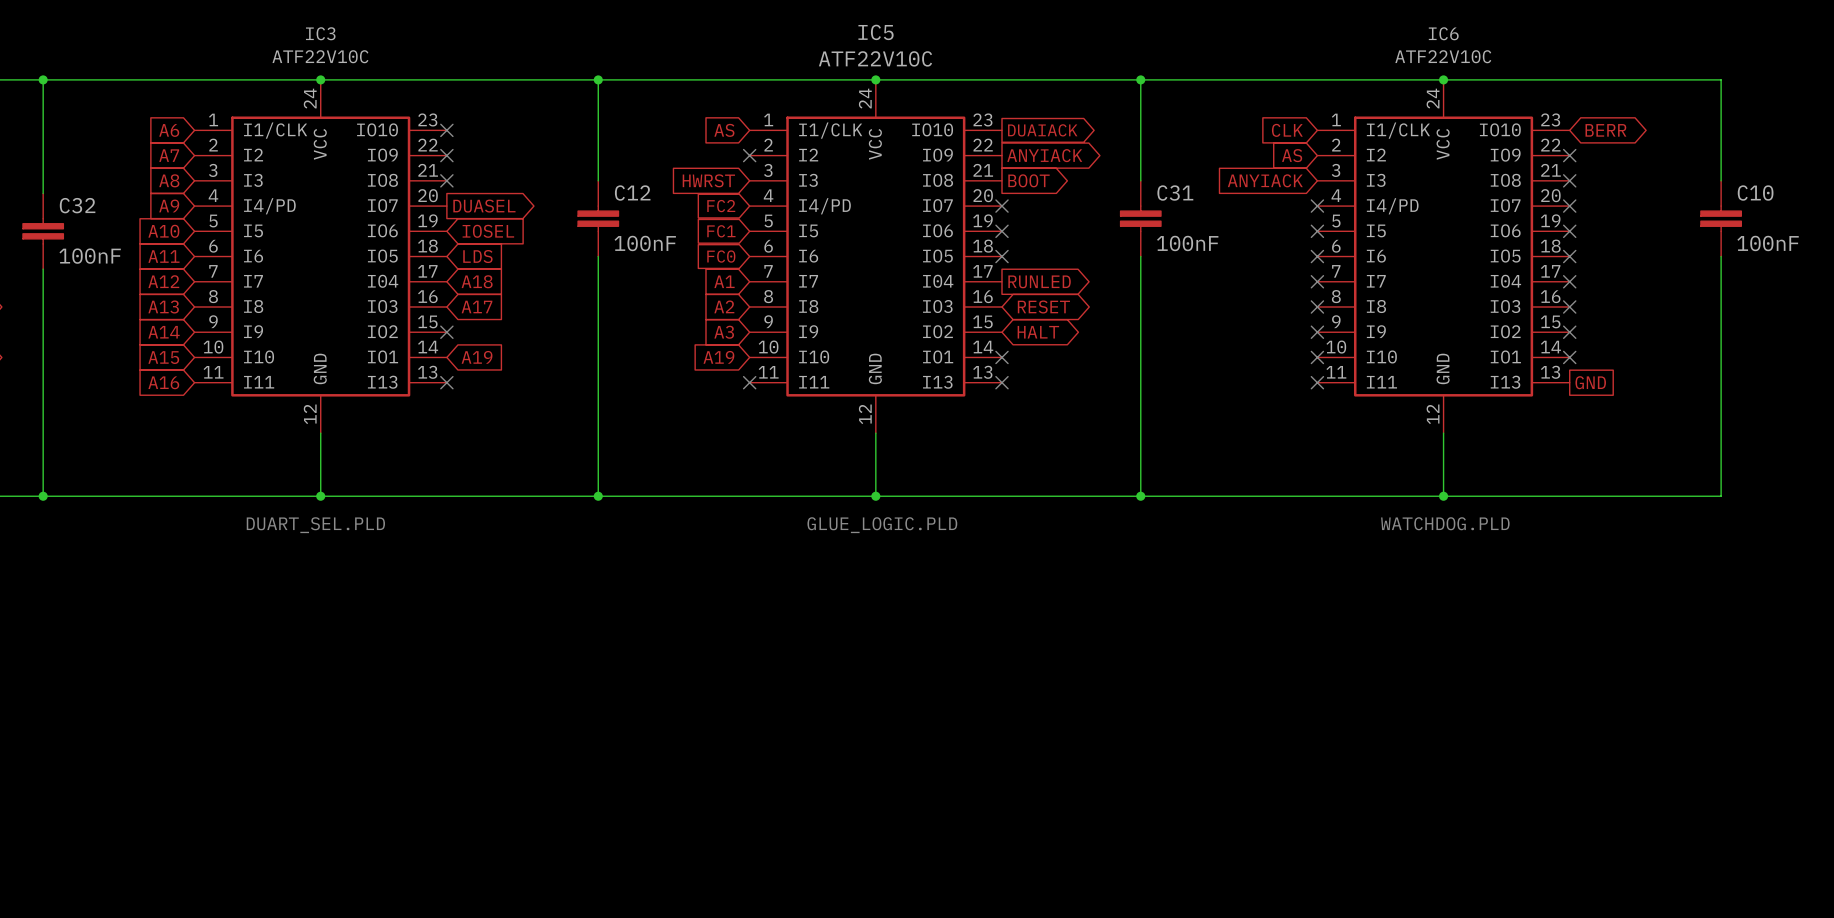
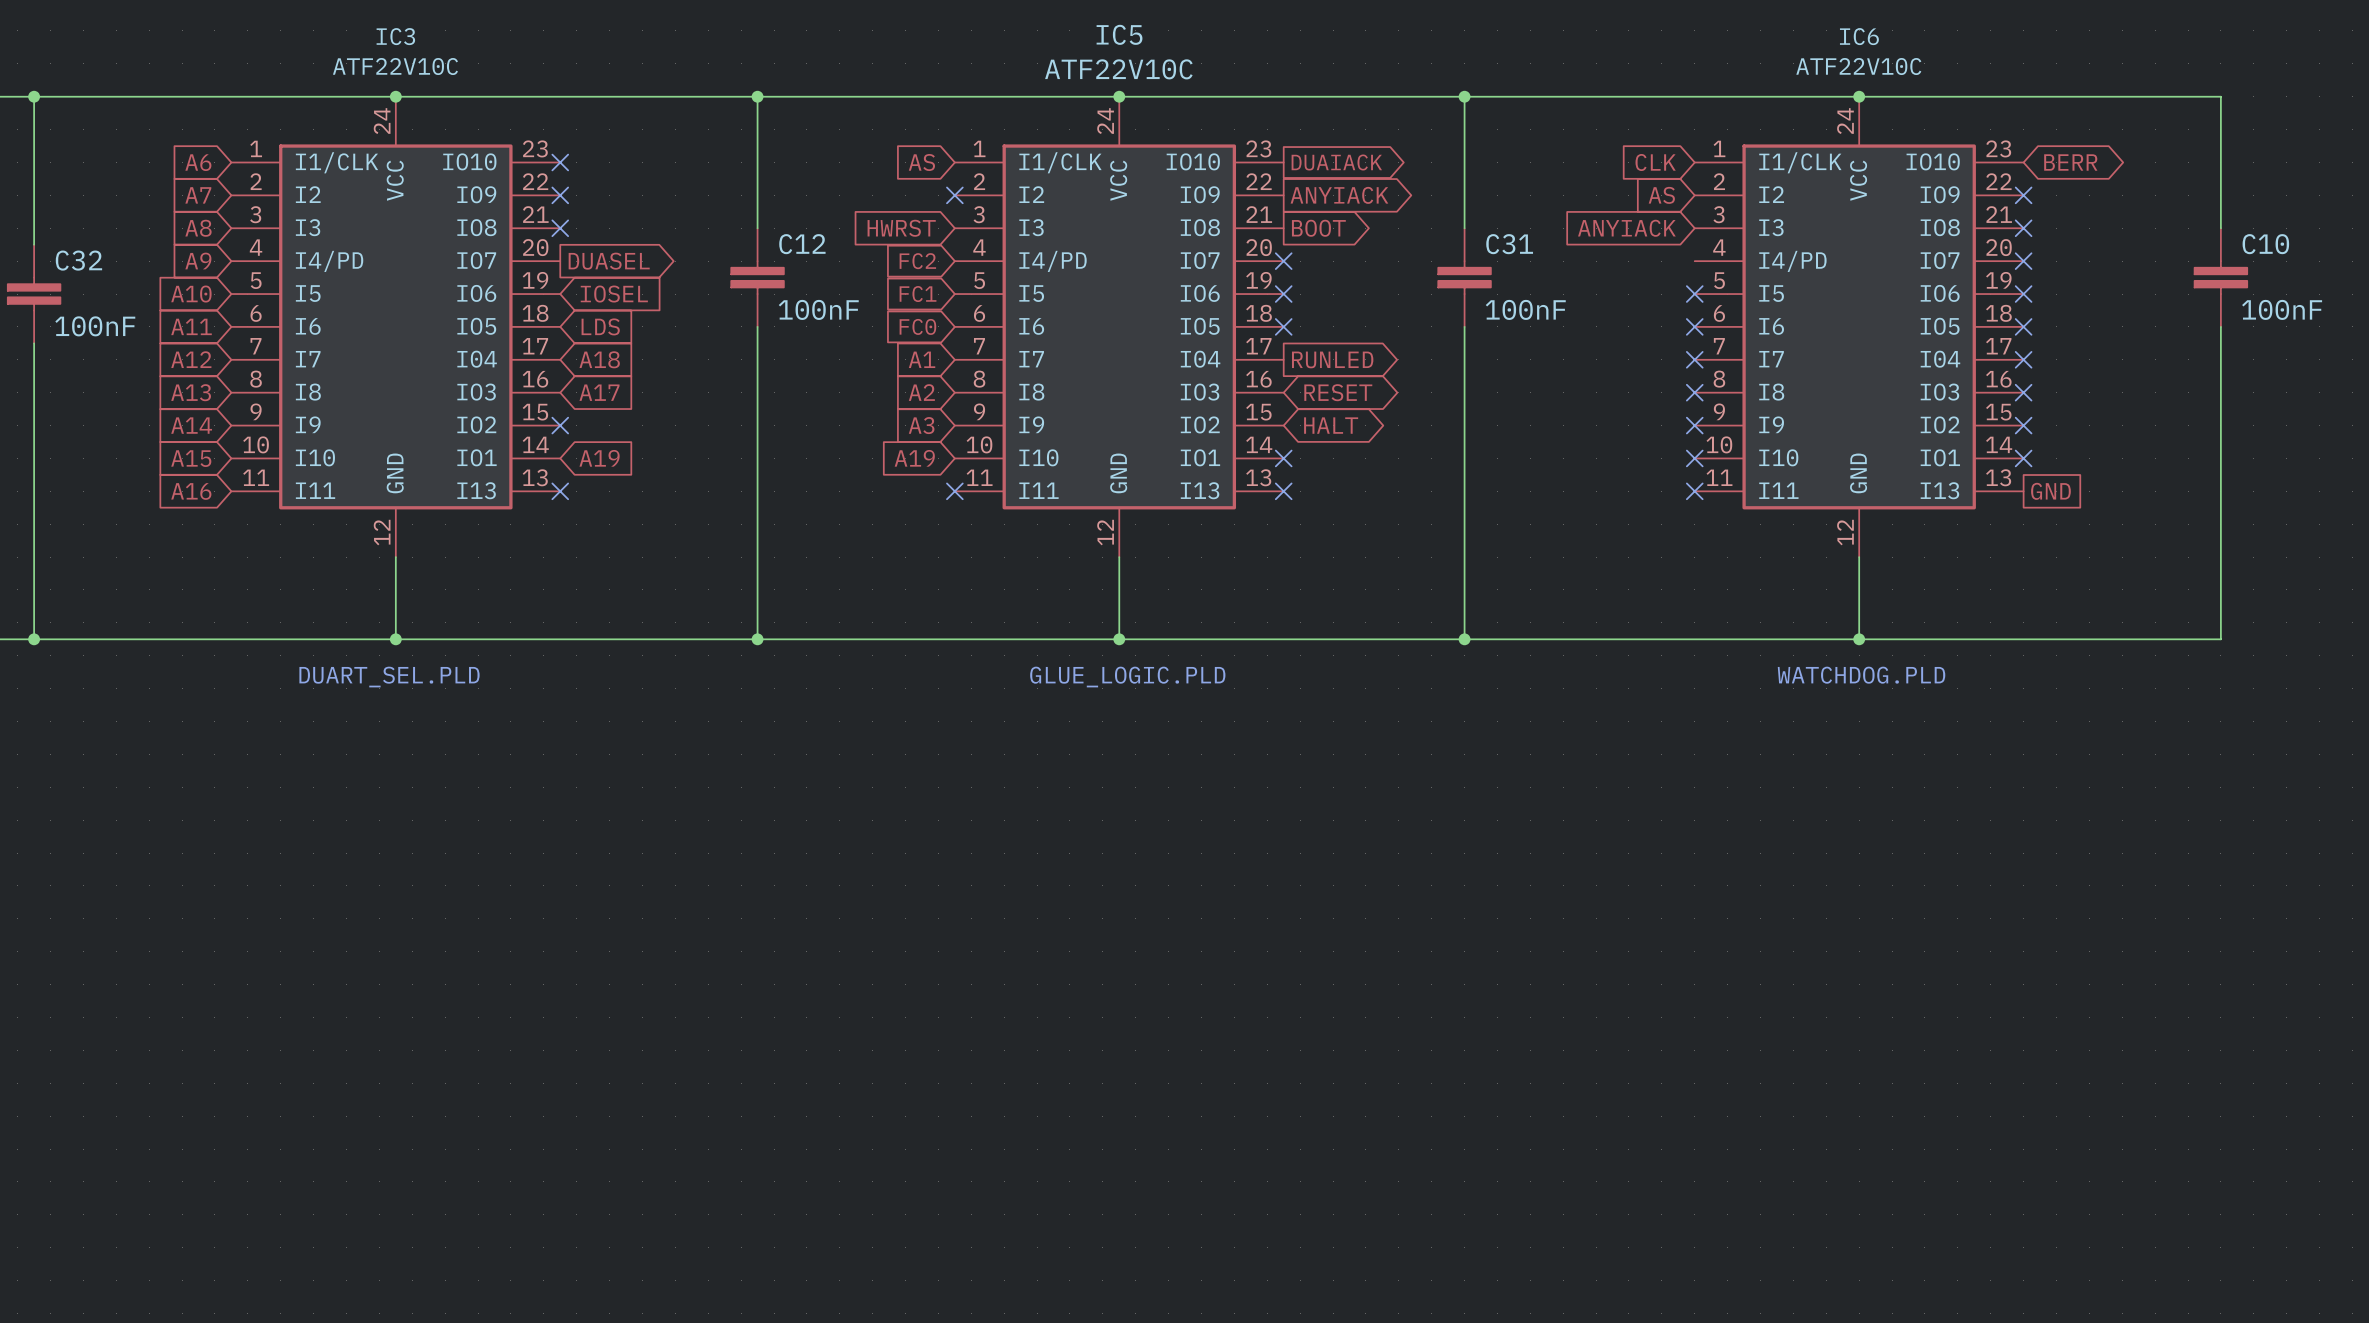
no-connect mark: (1317, 206) -> none

